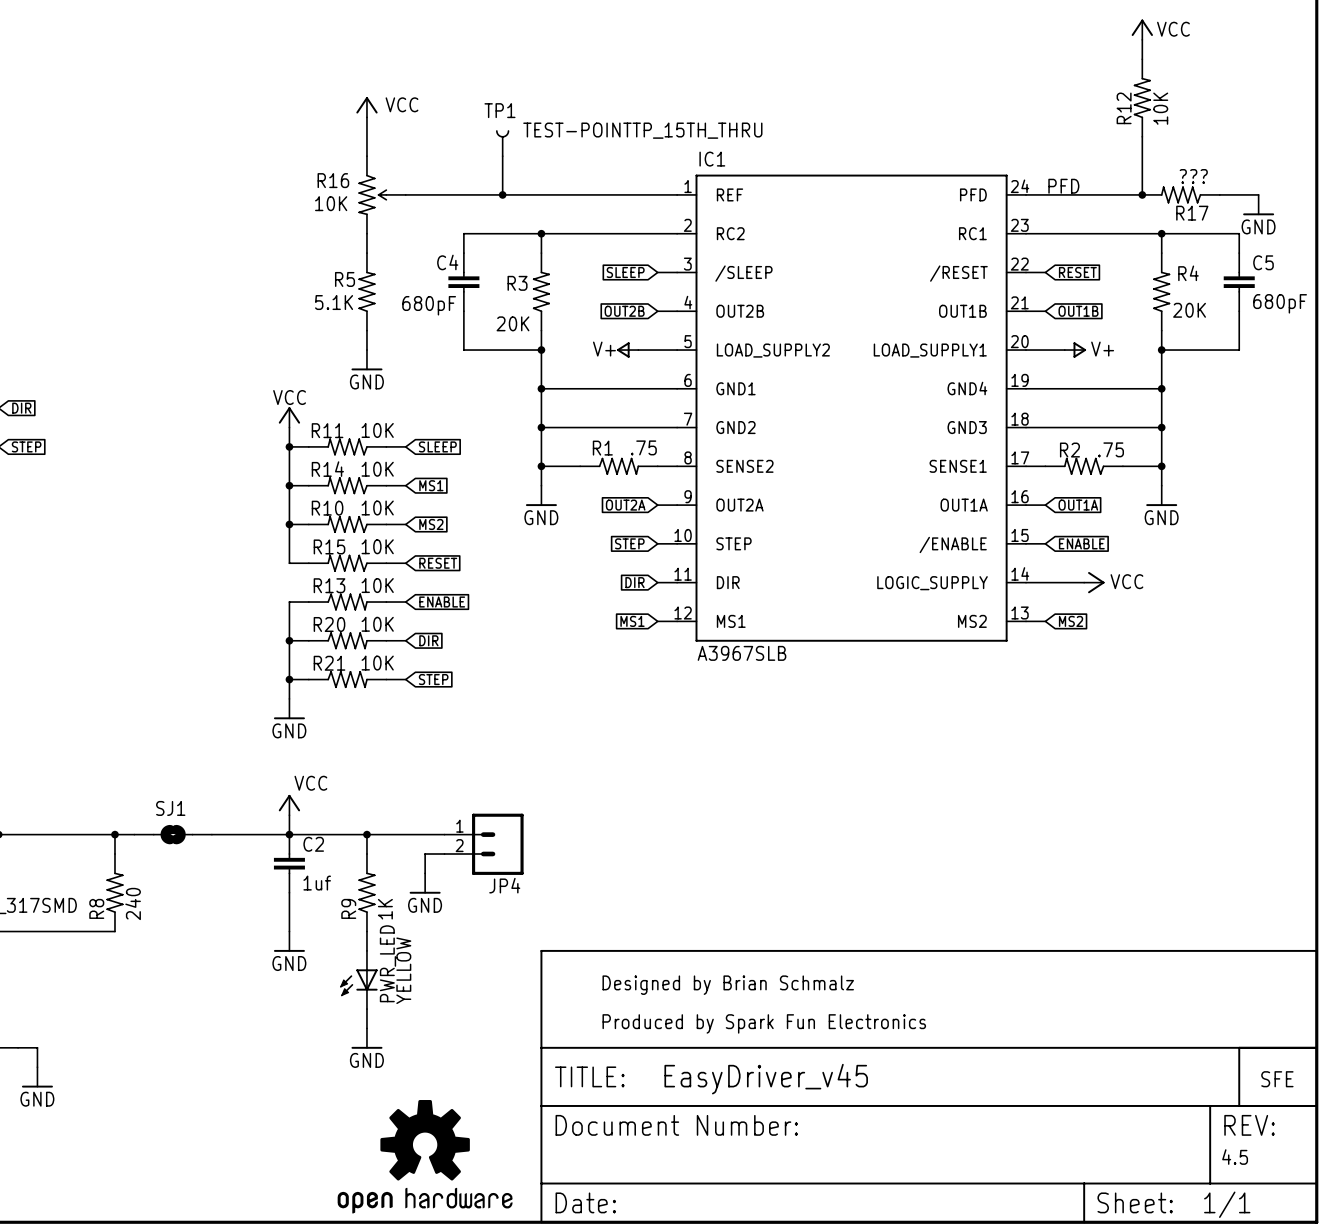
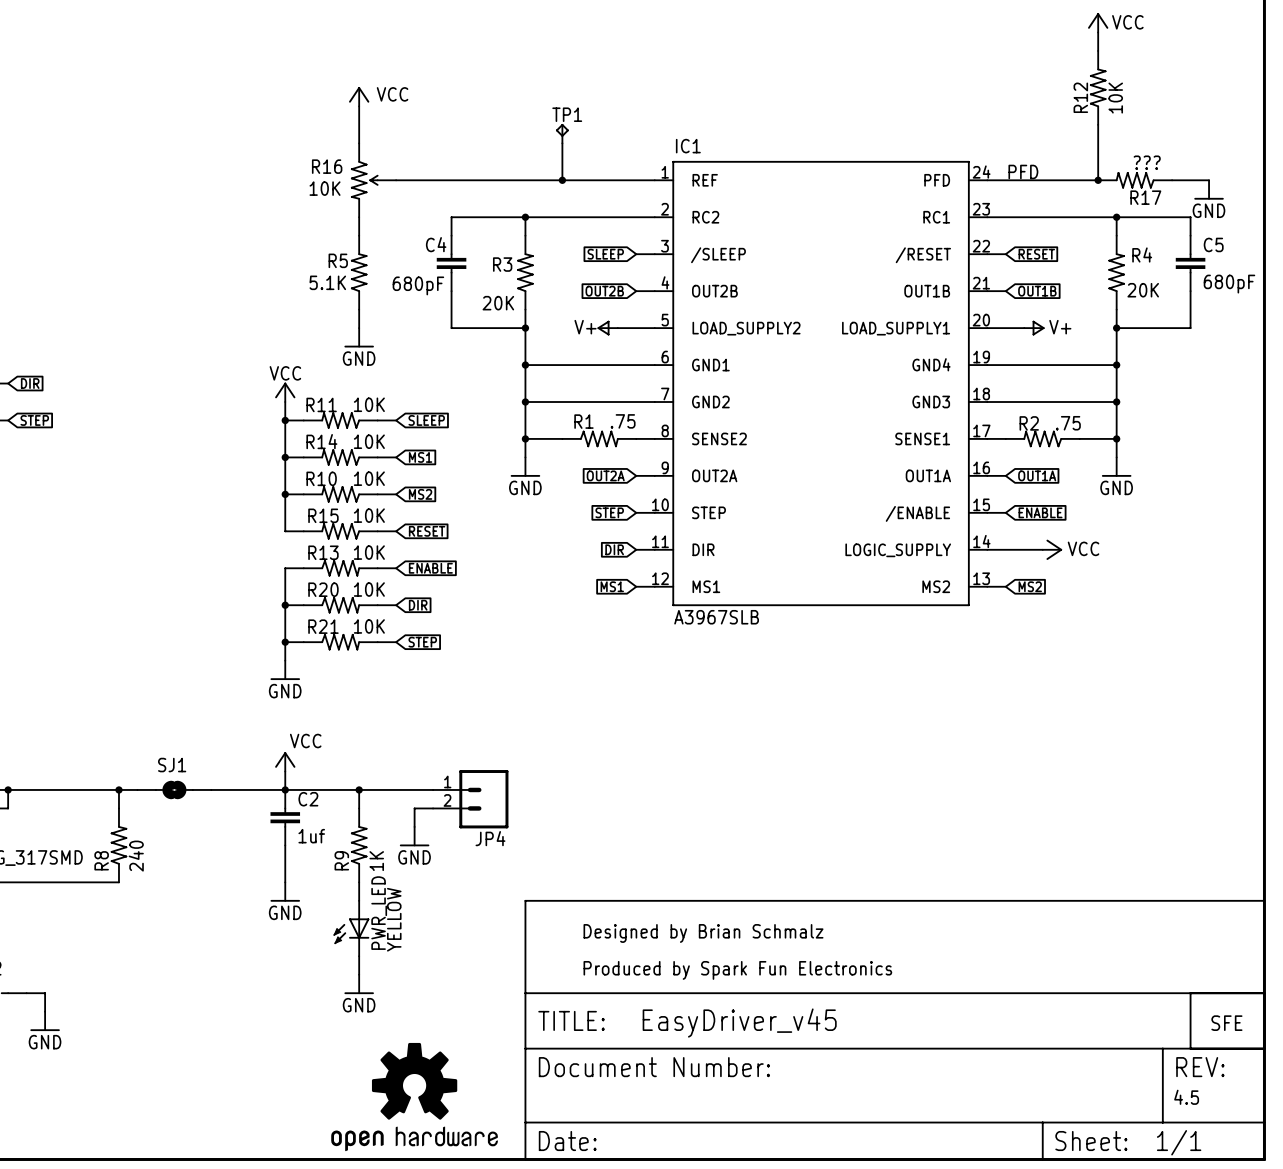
TP1 symbol: [496, 130, 510, 157] -> [555, 123, 569, 144]
TP1 value: TEST-POINTTP_15TH_THRU (642, 130) -> none
wire: (502, 156) (502, 194) -> (562, 143) (562, 180)
junction: (502, 194) -> none
junction: none -> (562, 180)

